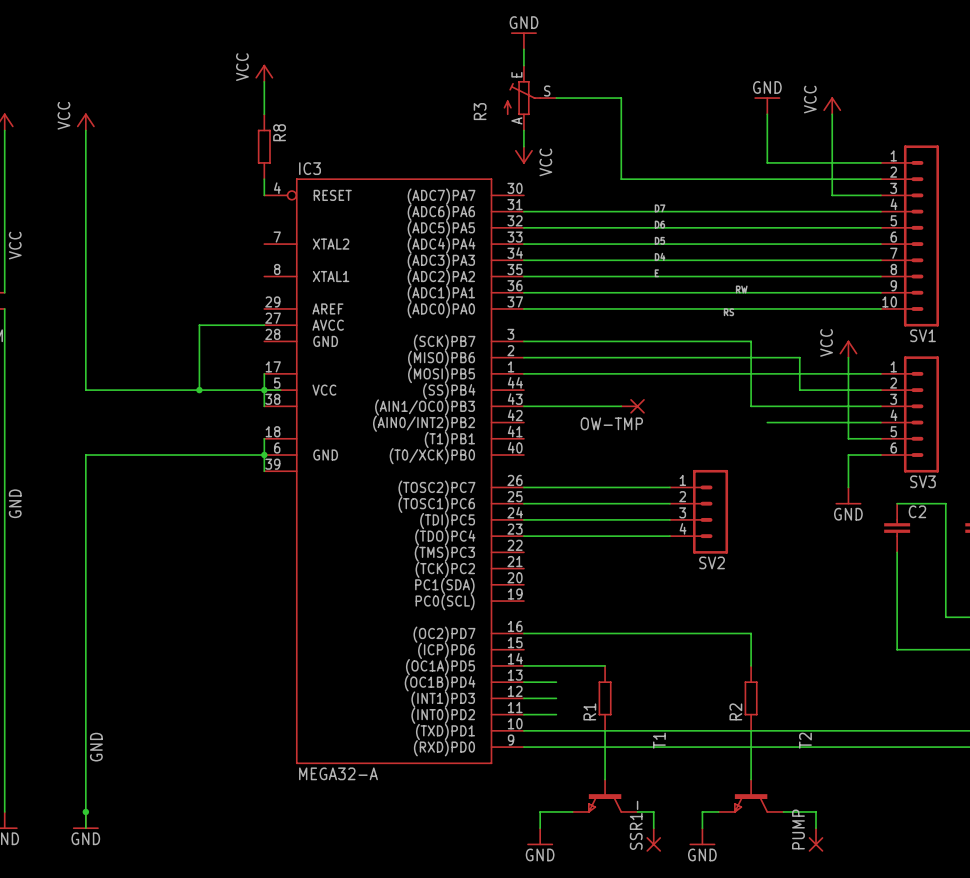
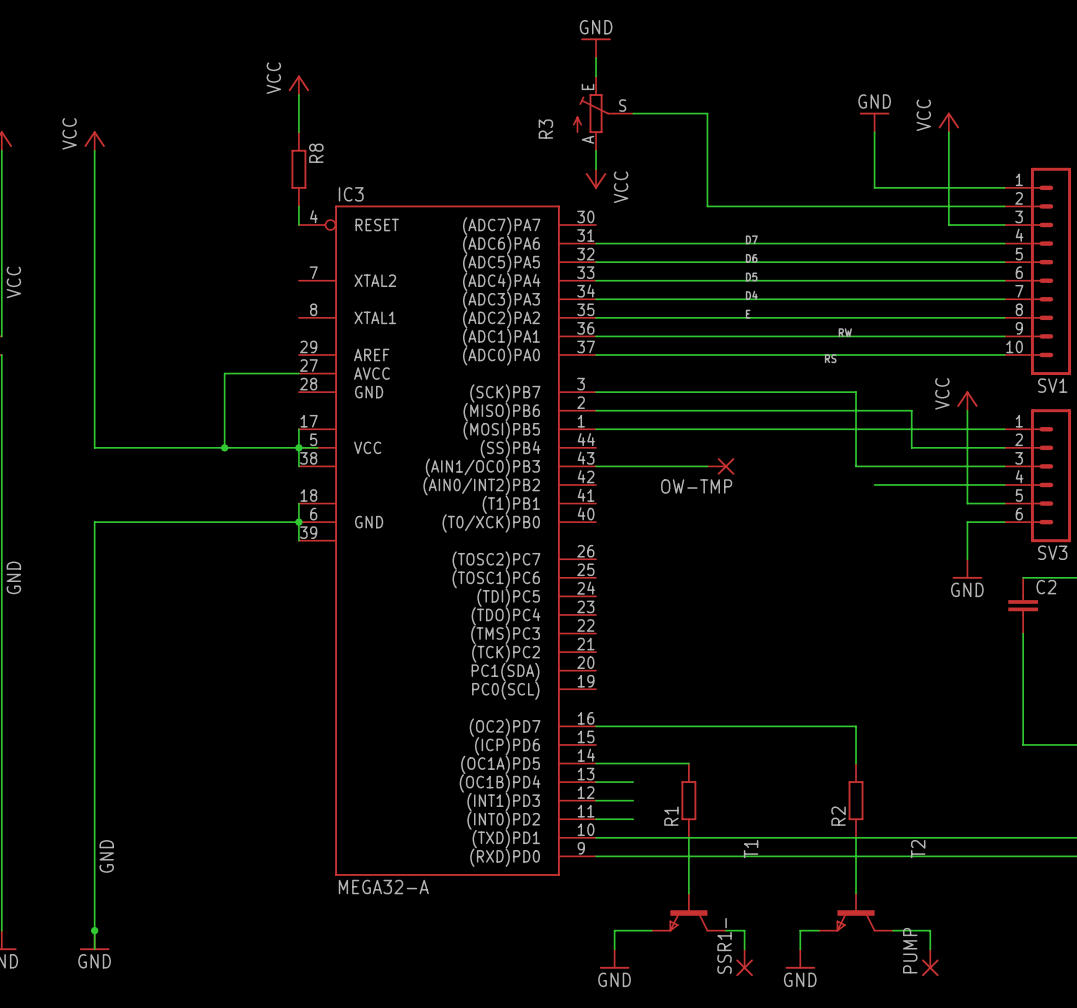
wire: (523, 487) (669, 487) -> none
wire: (523, 503) (669, 503) -> none
SV2: (699, 511) -> none
wire: (523, 519) (669, 519) -> none
wire: (523, 536) (669, 536) -> none

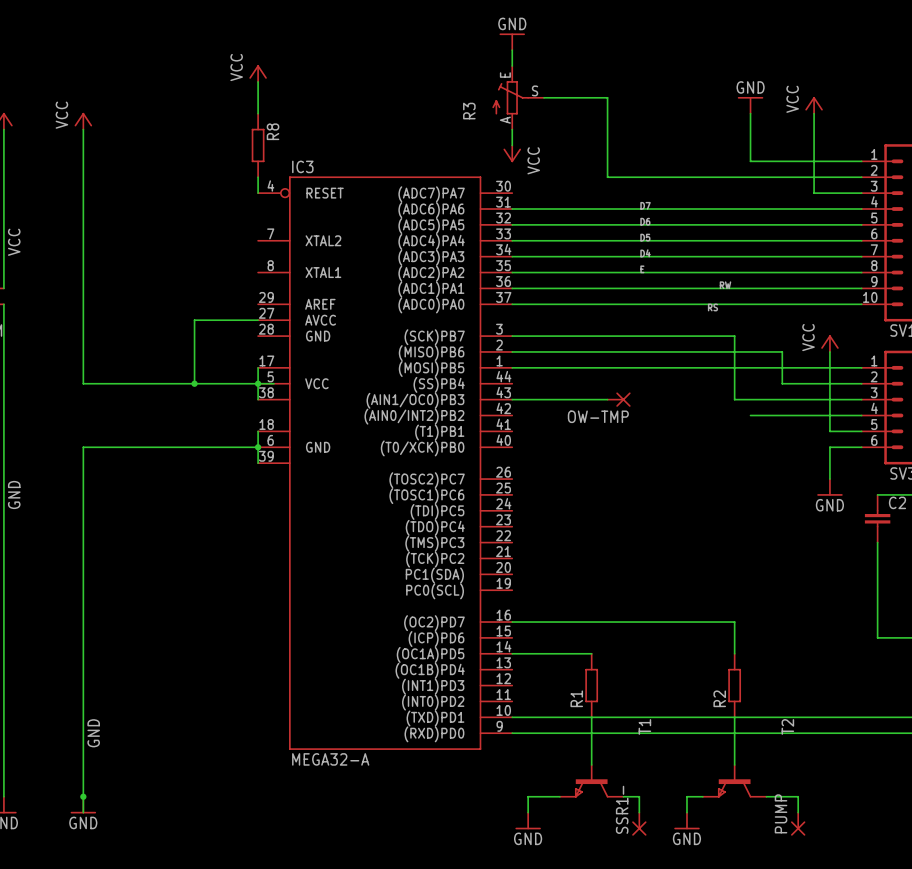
wire: (596, 782) (633, 782) -> none
wire: (596, 800) (633, 800) -> none
wire: (596, 819) (633, 819) -> none

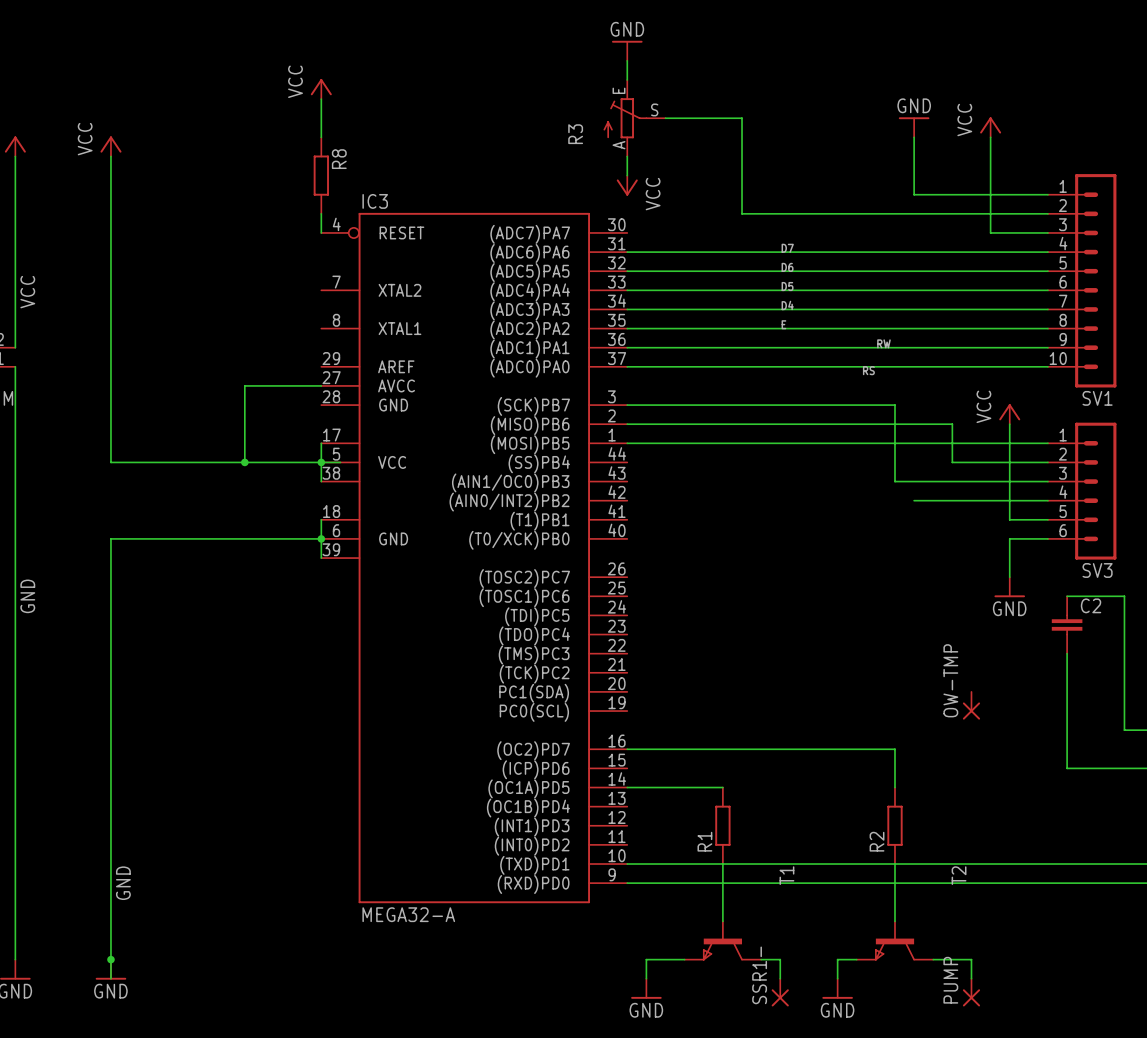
wire: (512, 399) (607, 399) -> none
OW-TMP: (619, 399) -> none
OW-TMP: none -> (971, 705)

